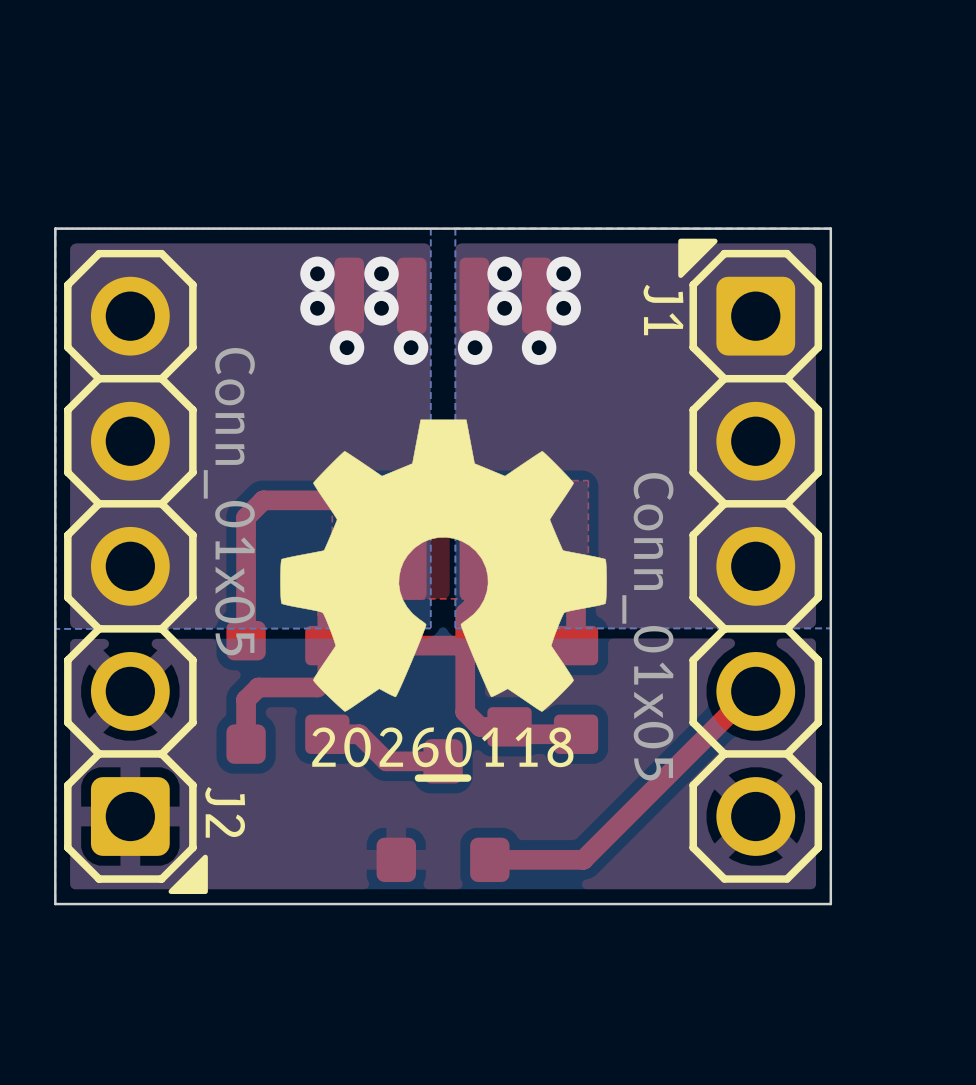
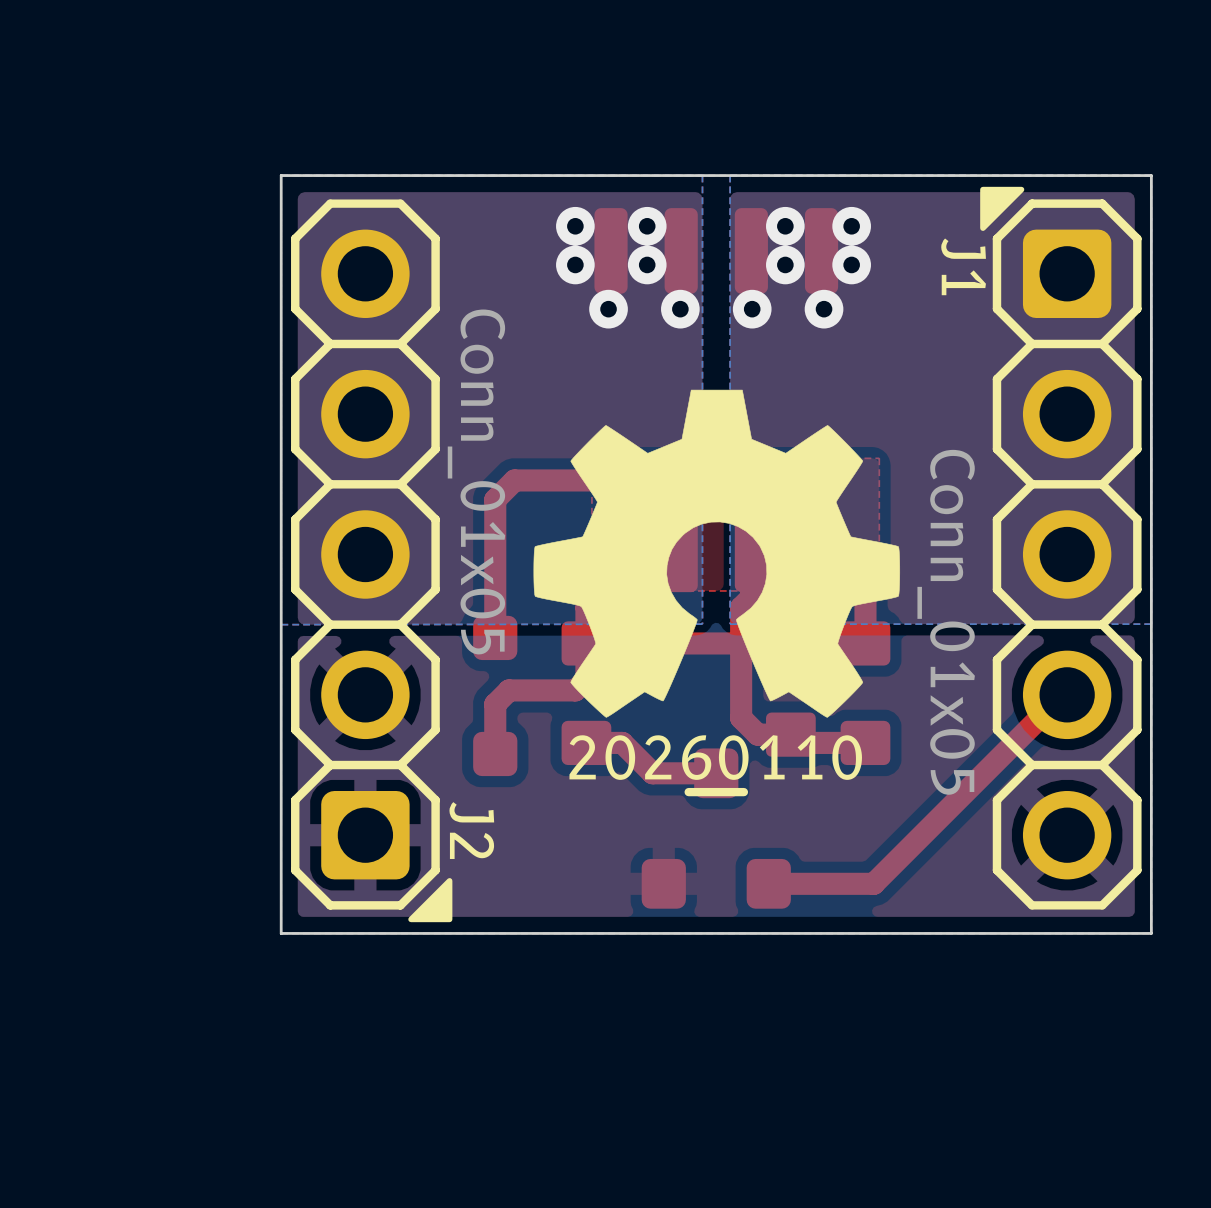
drawing shape: [312, 727, 574, 782] -> [569, 735, 862, 797]

